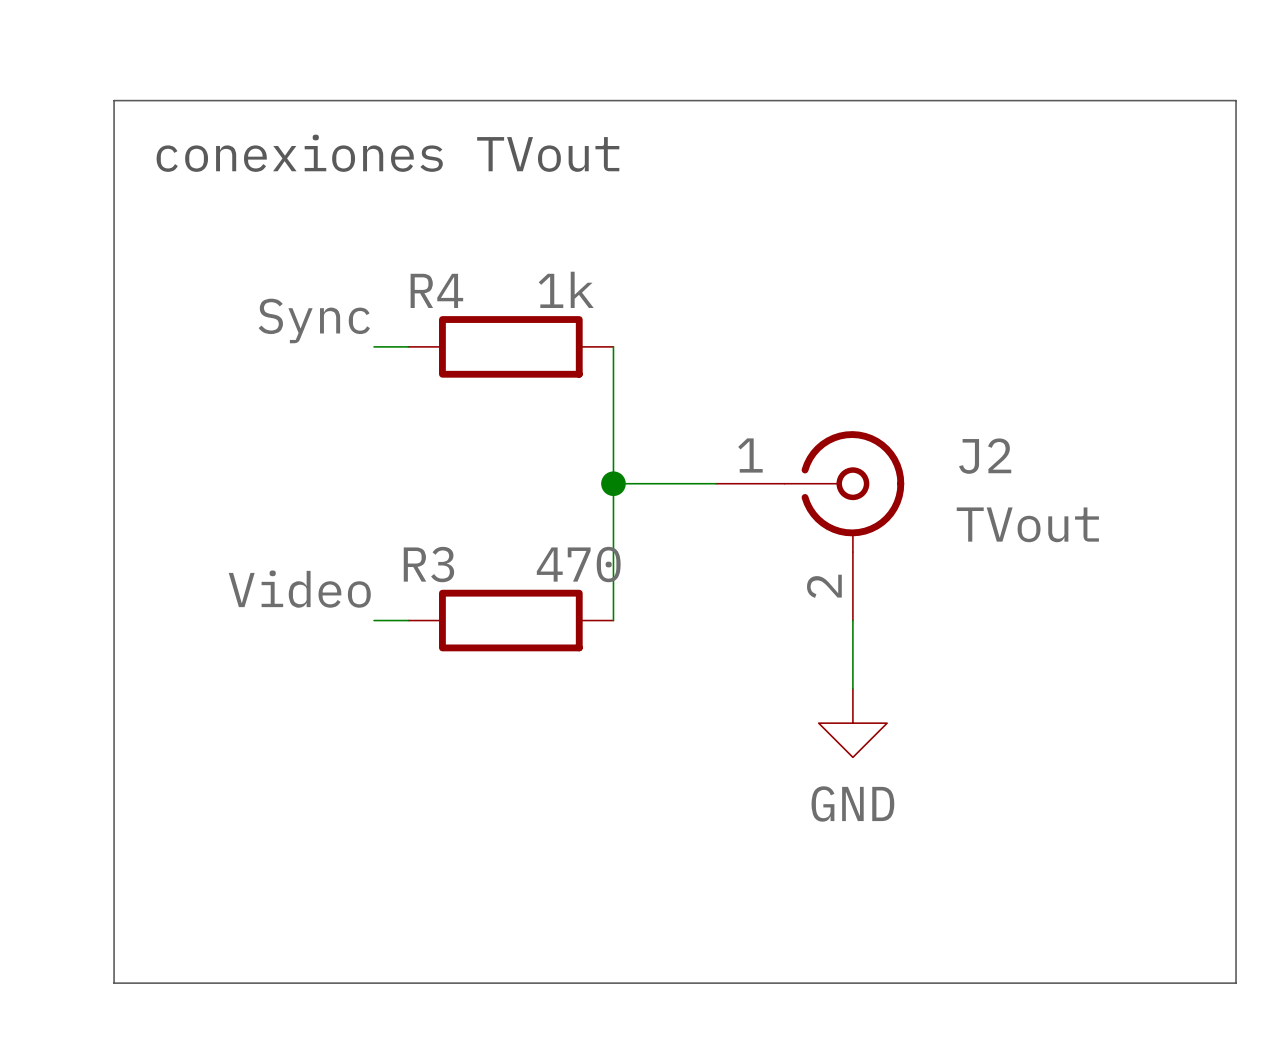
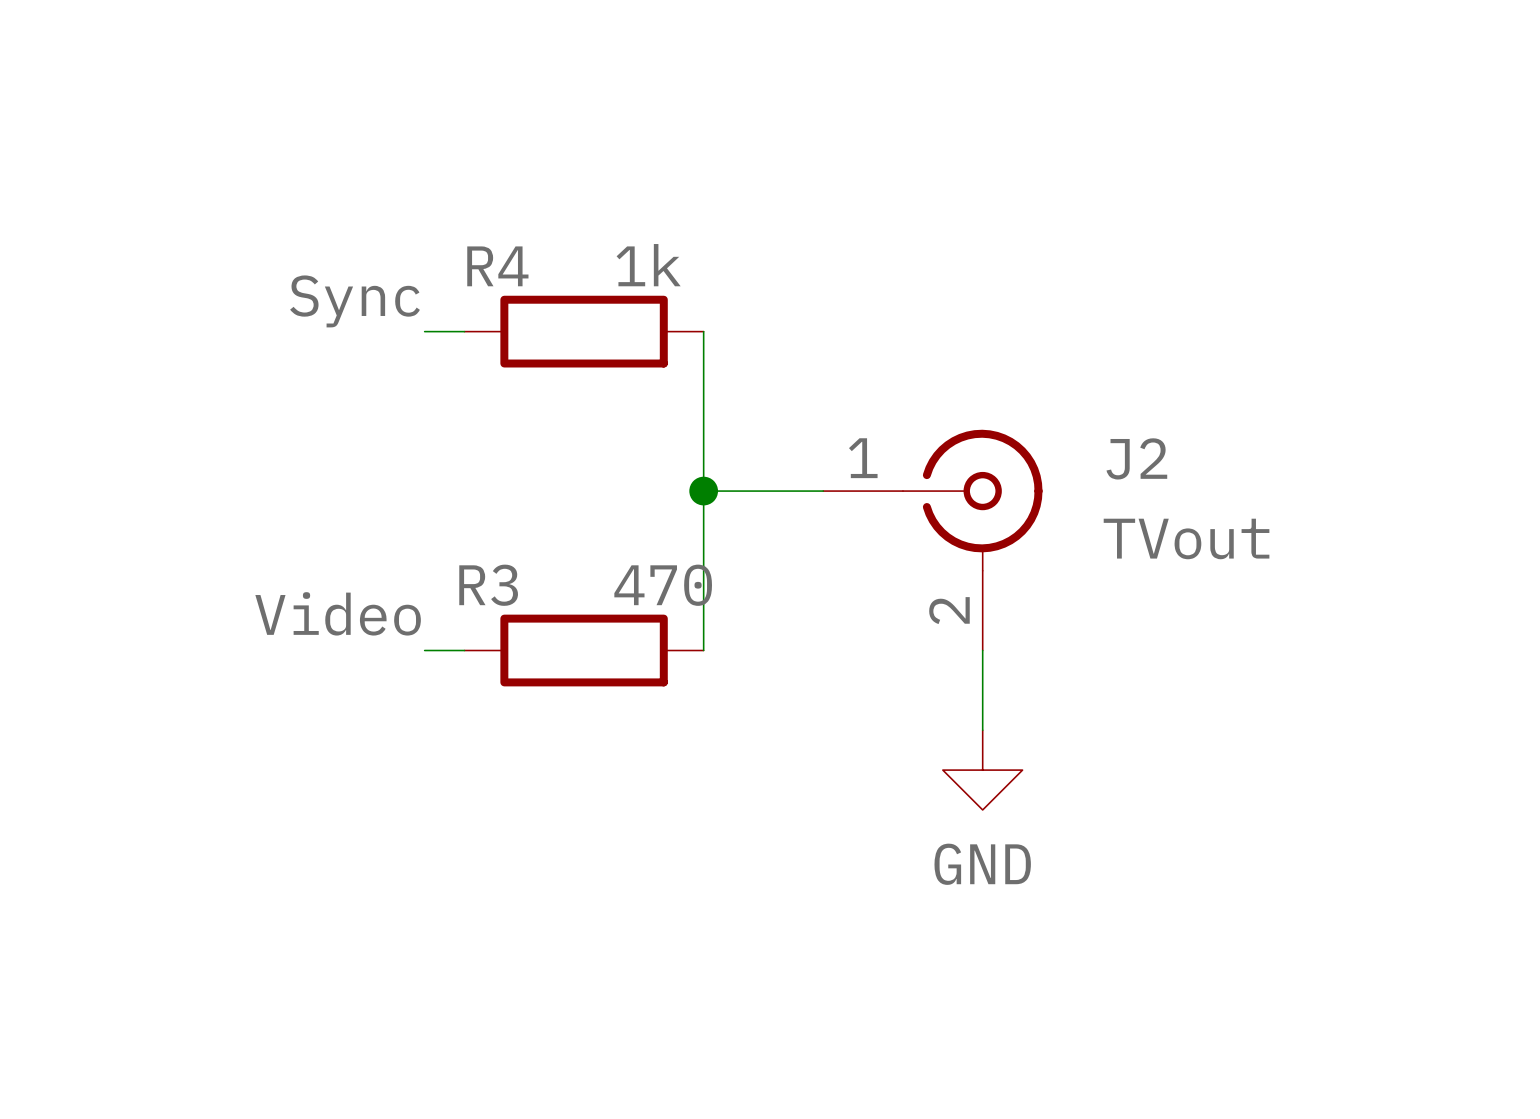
line: (114, 100) (1236, 100) (1236, 983) (114, 983) (114, 100) -> none
text: conexiones TVout (387, 153) -> none

